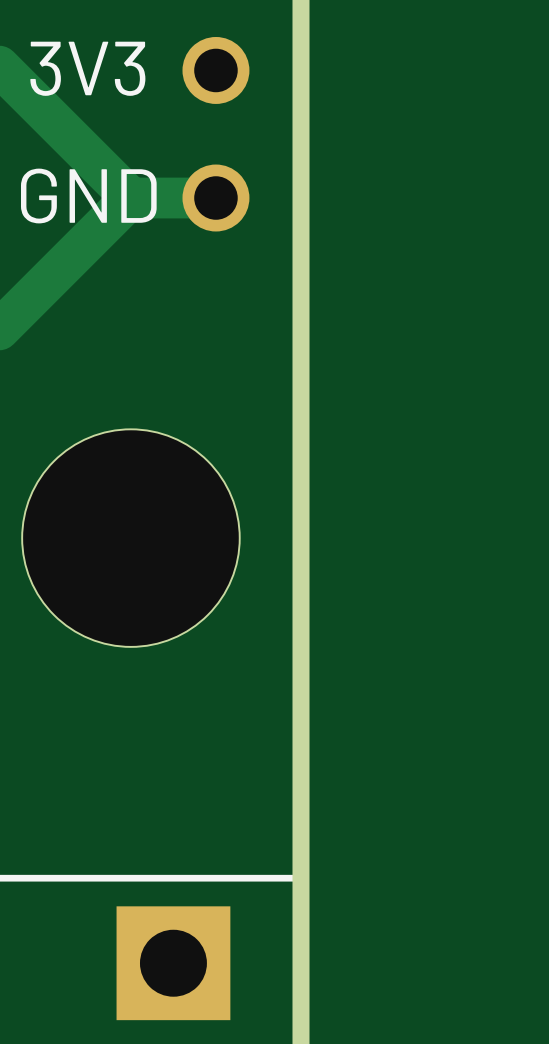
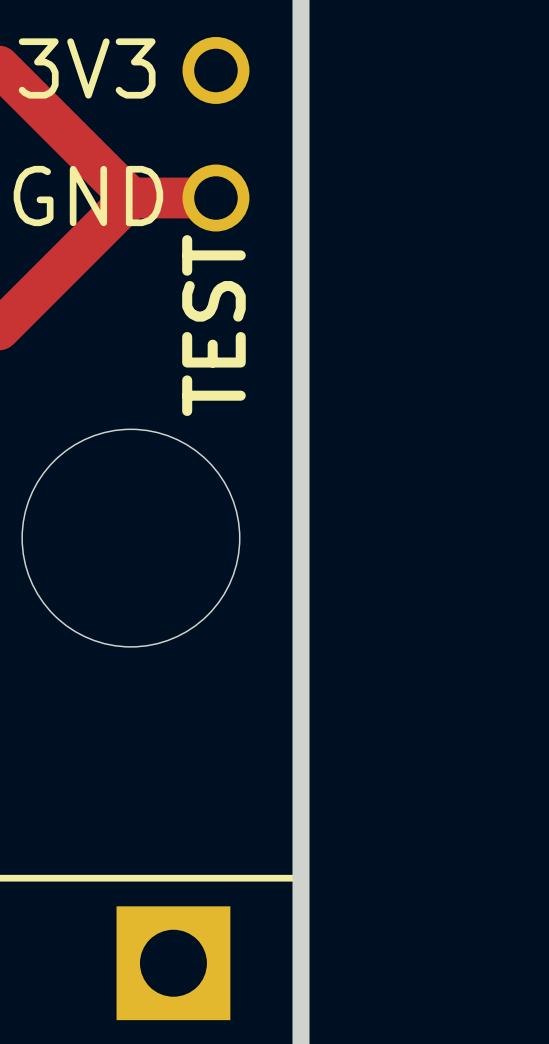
part value: none -> TEST (213, 325)

